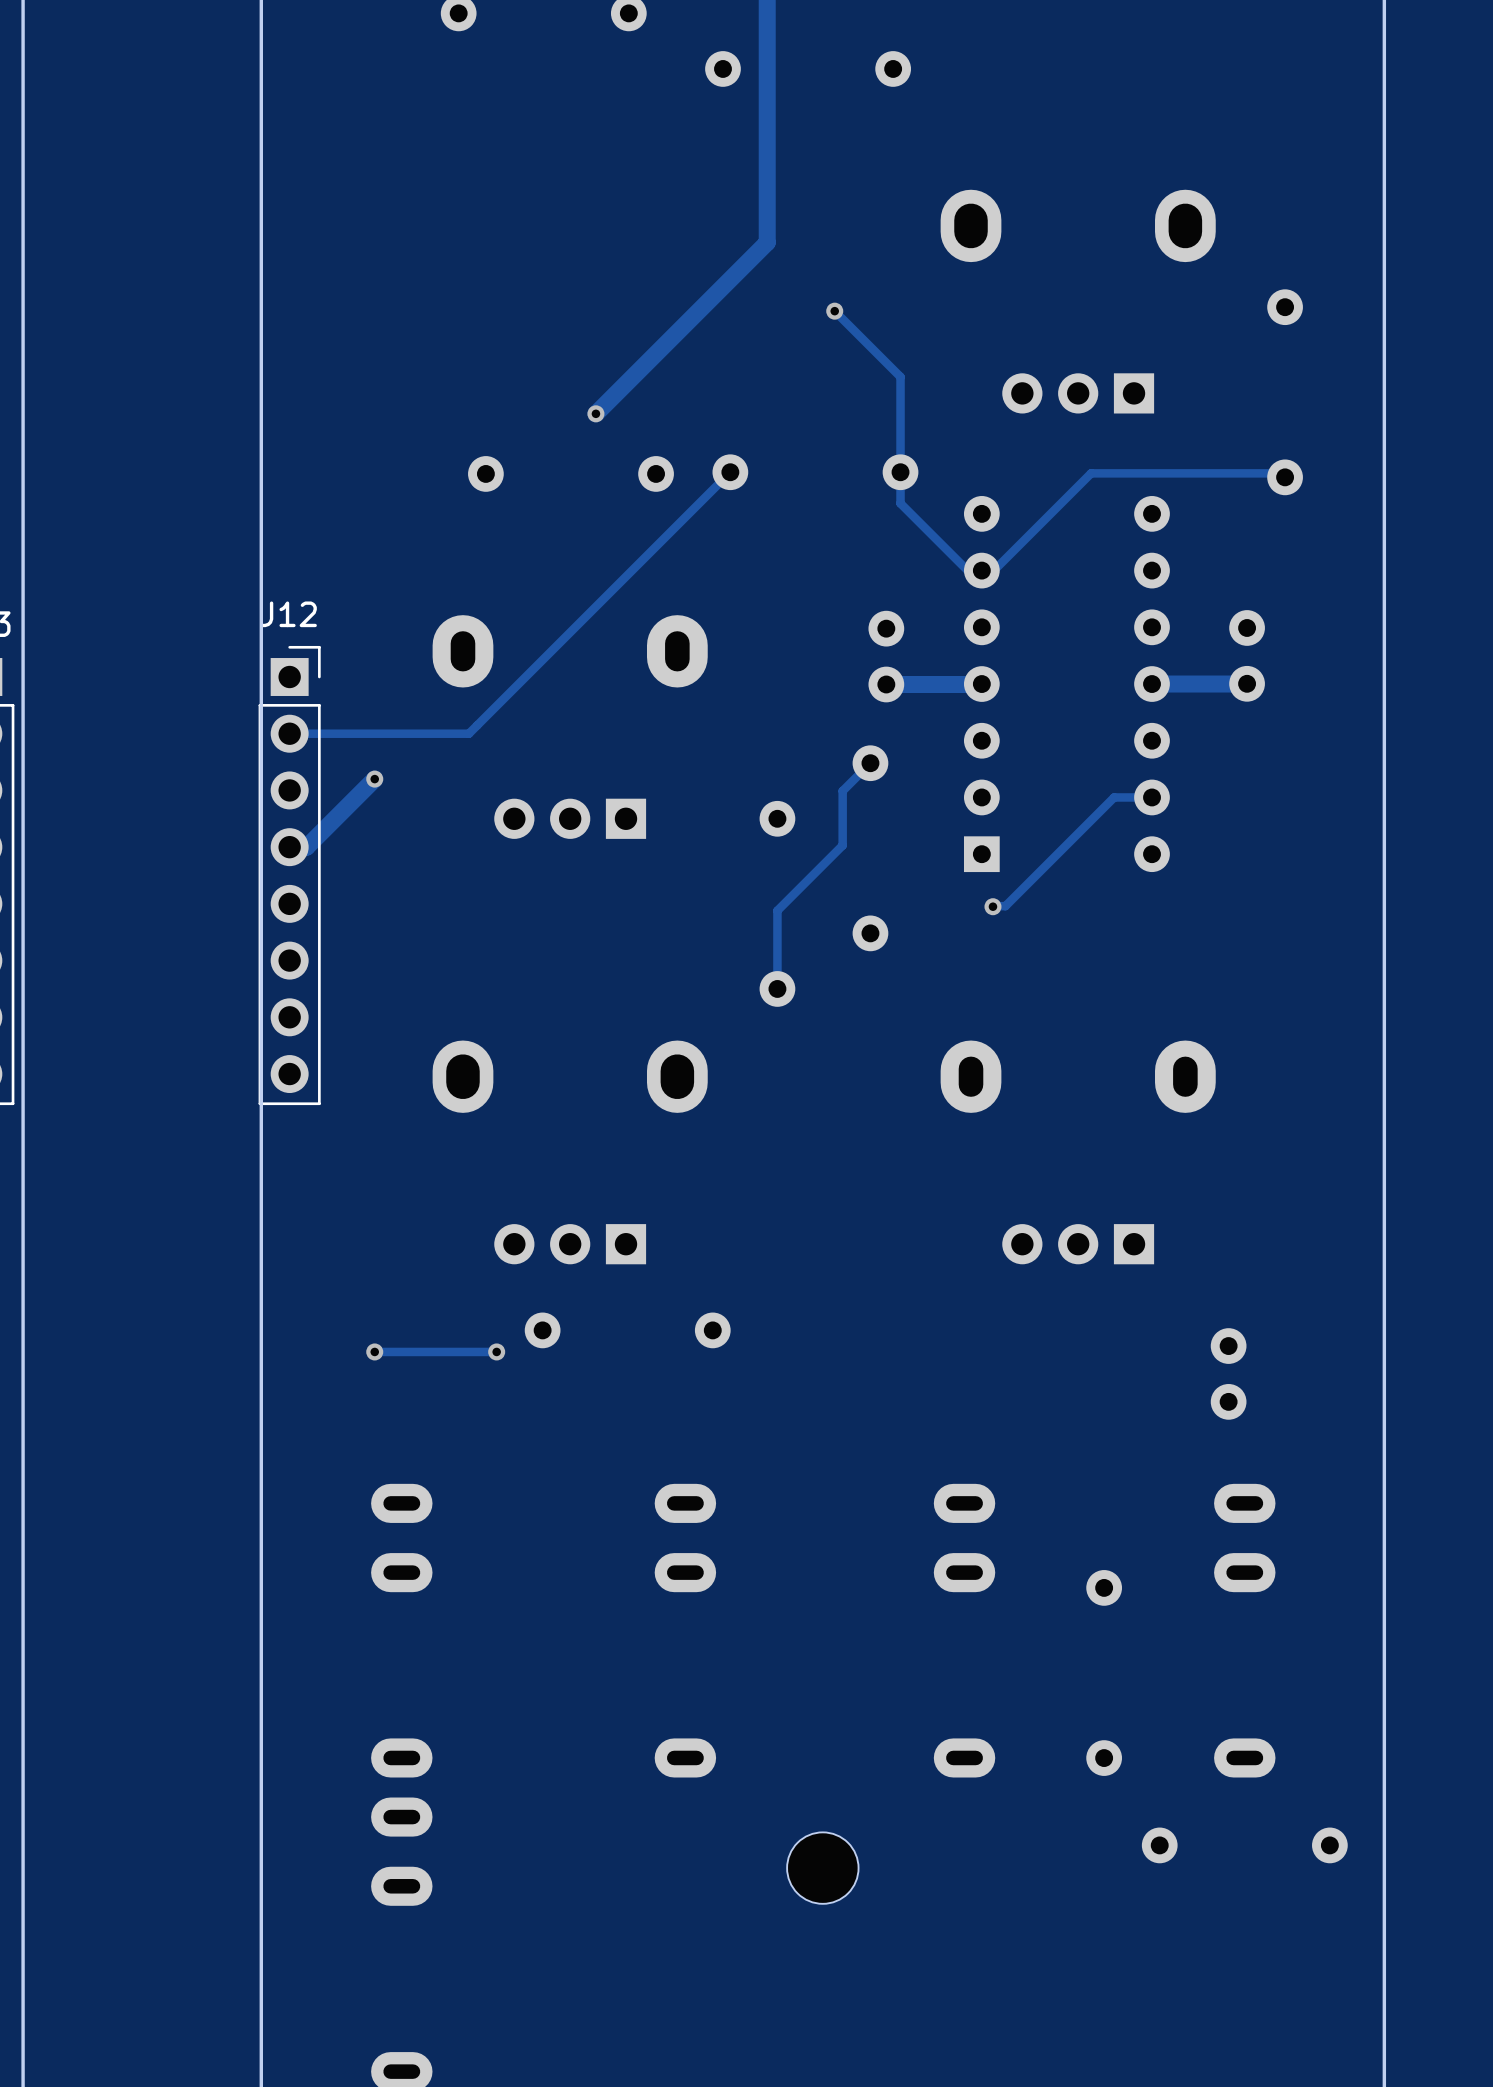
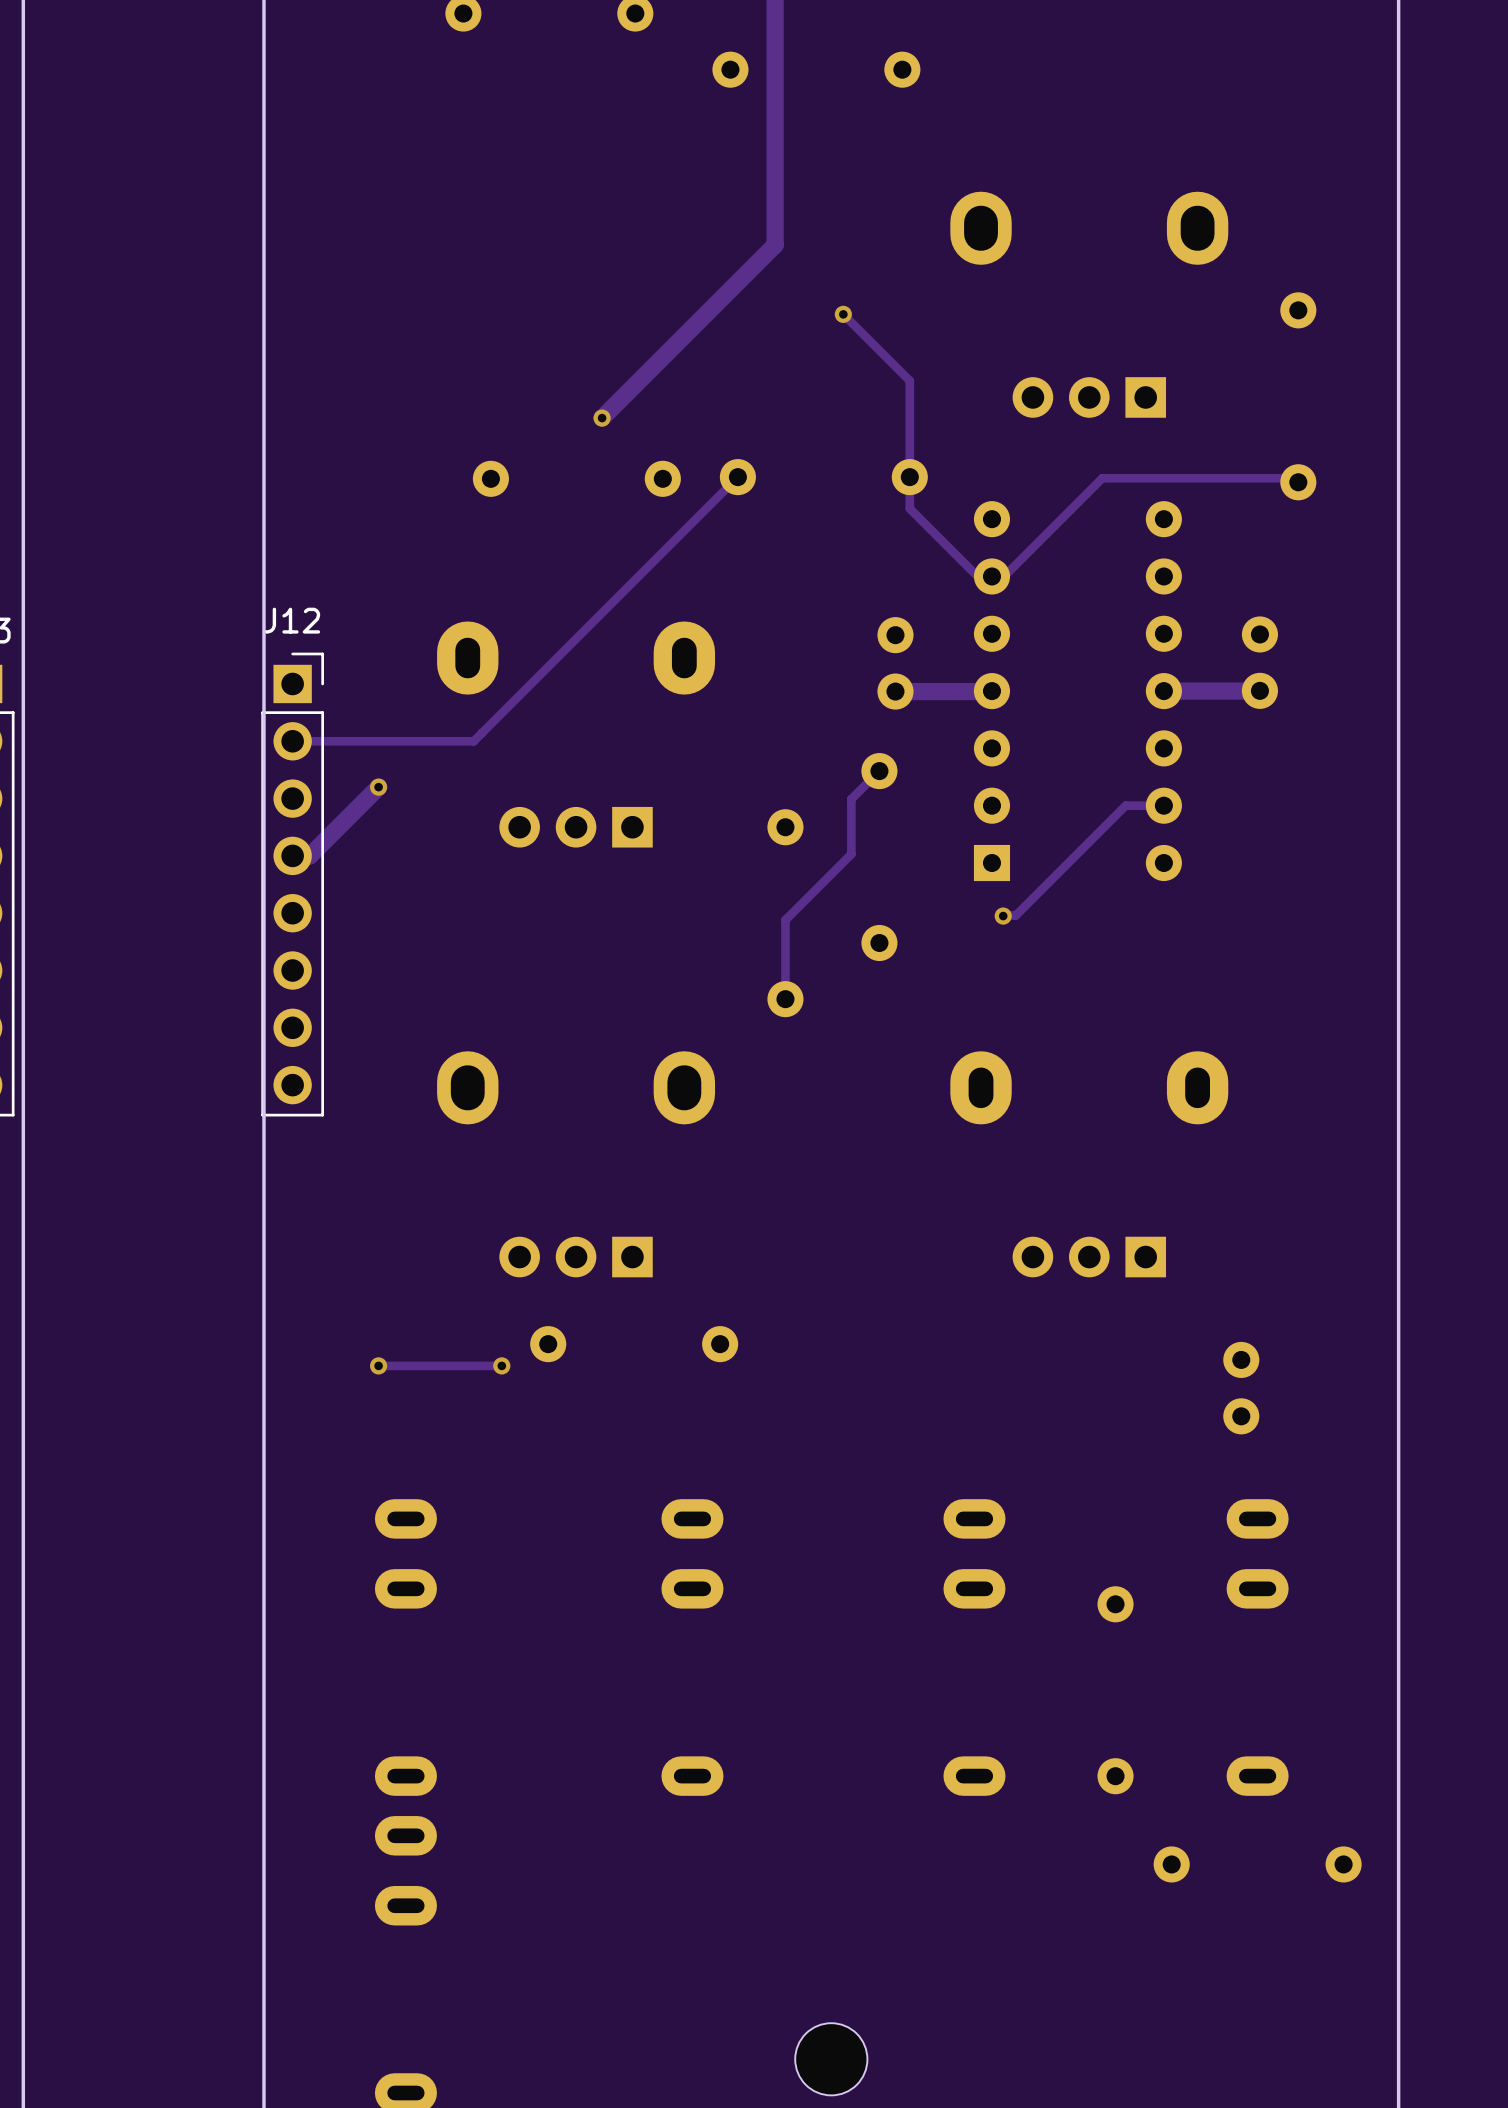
part position: (822, 1868) -> (831, 2059)

